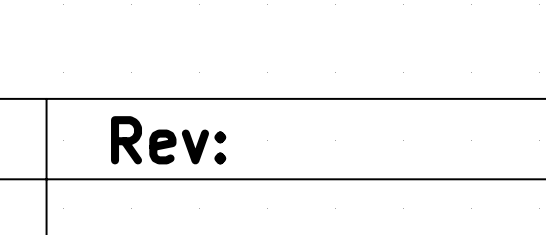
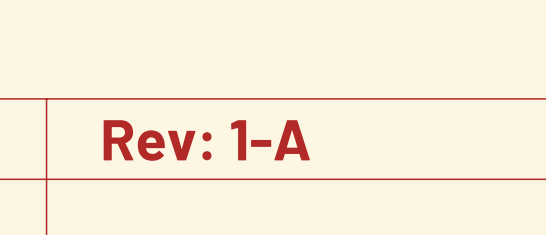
title block: Rev: (168, 140) -> Rev: 1-A (206, 140)

